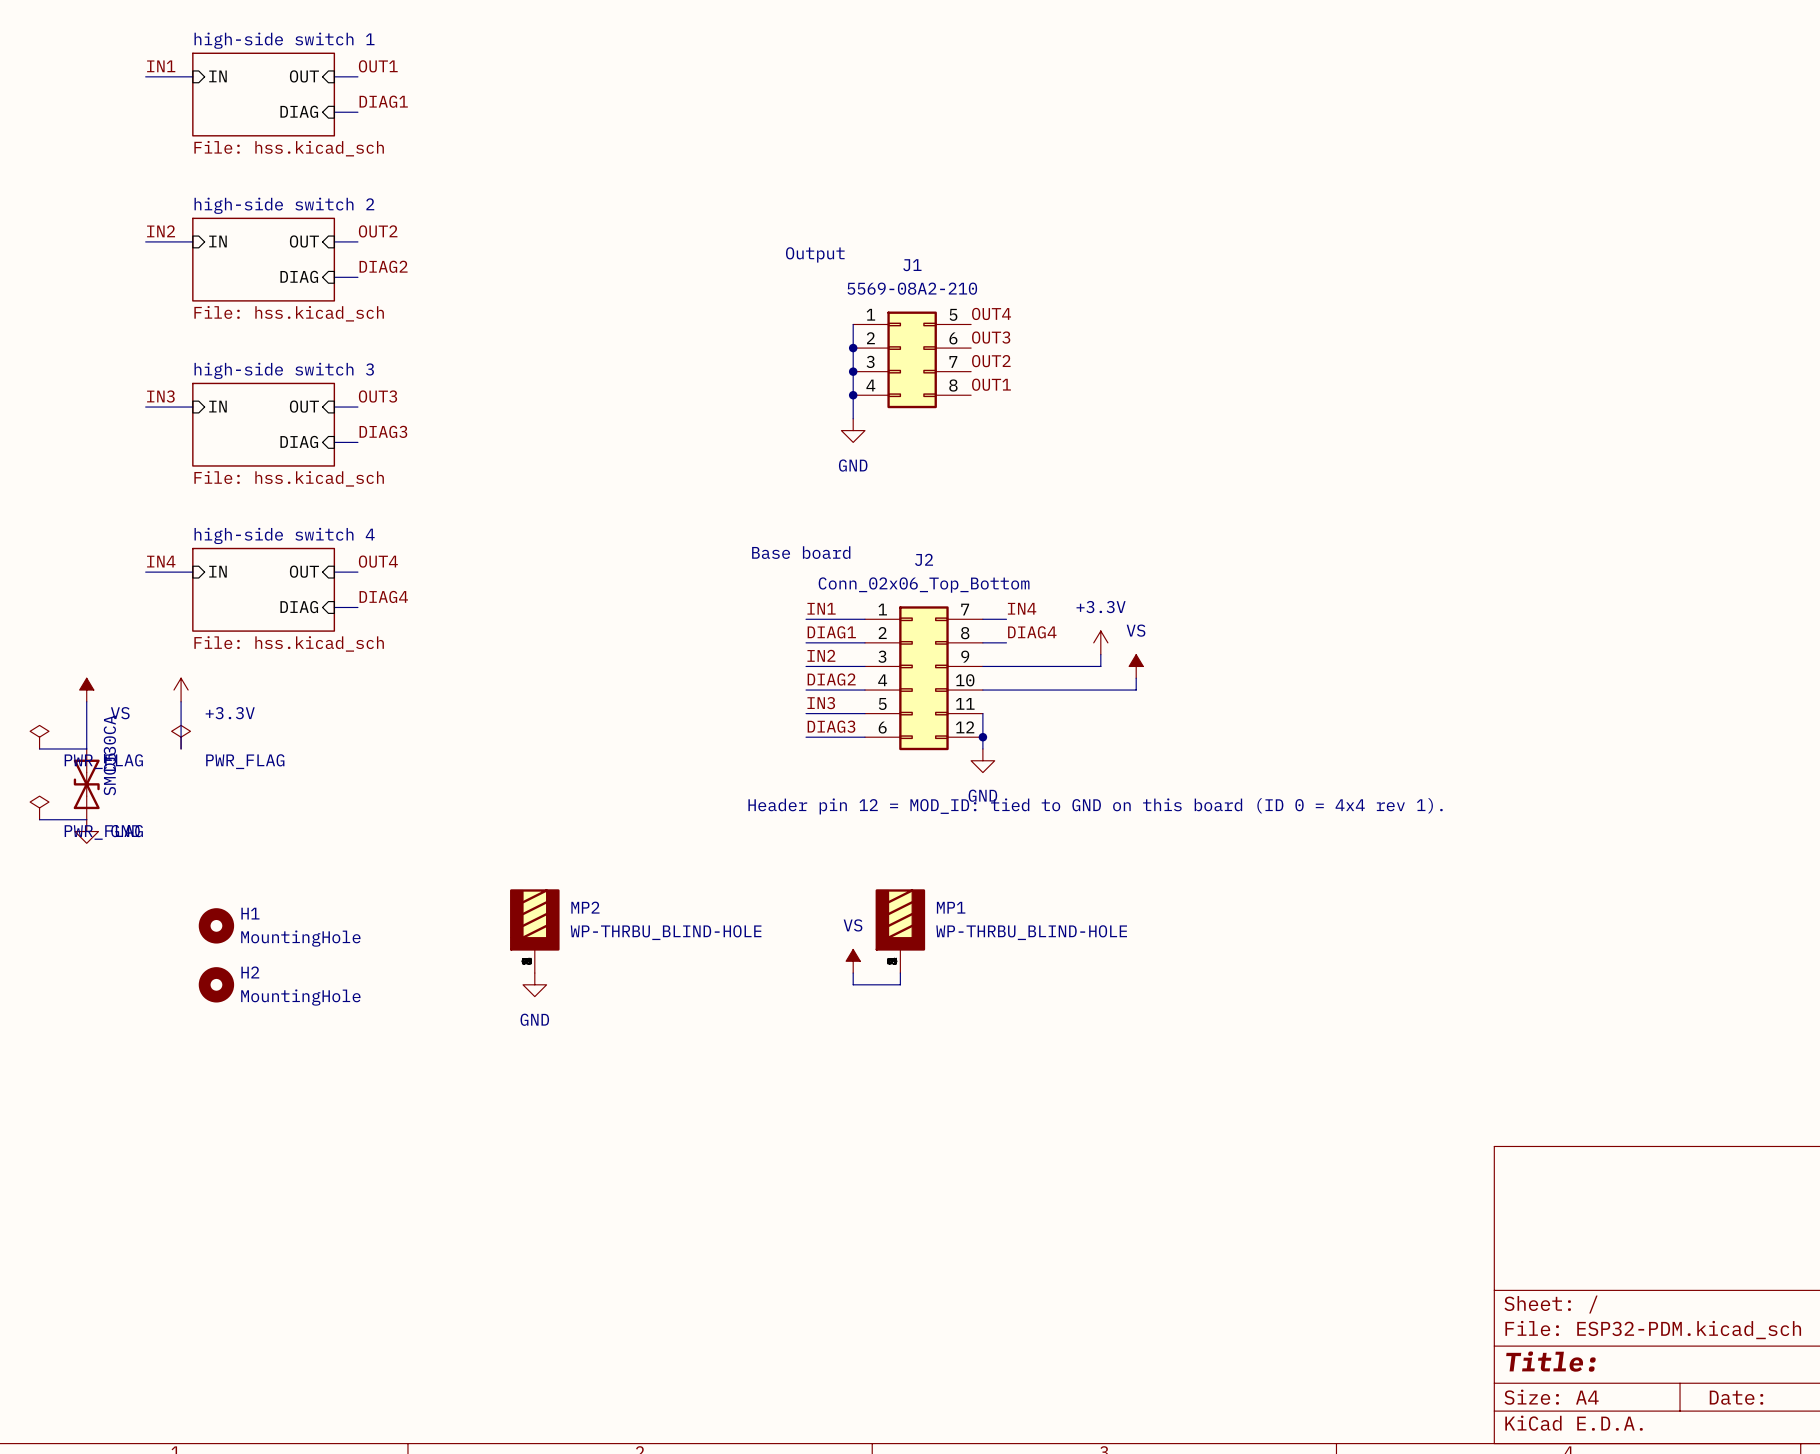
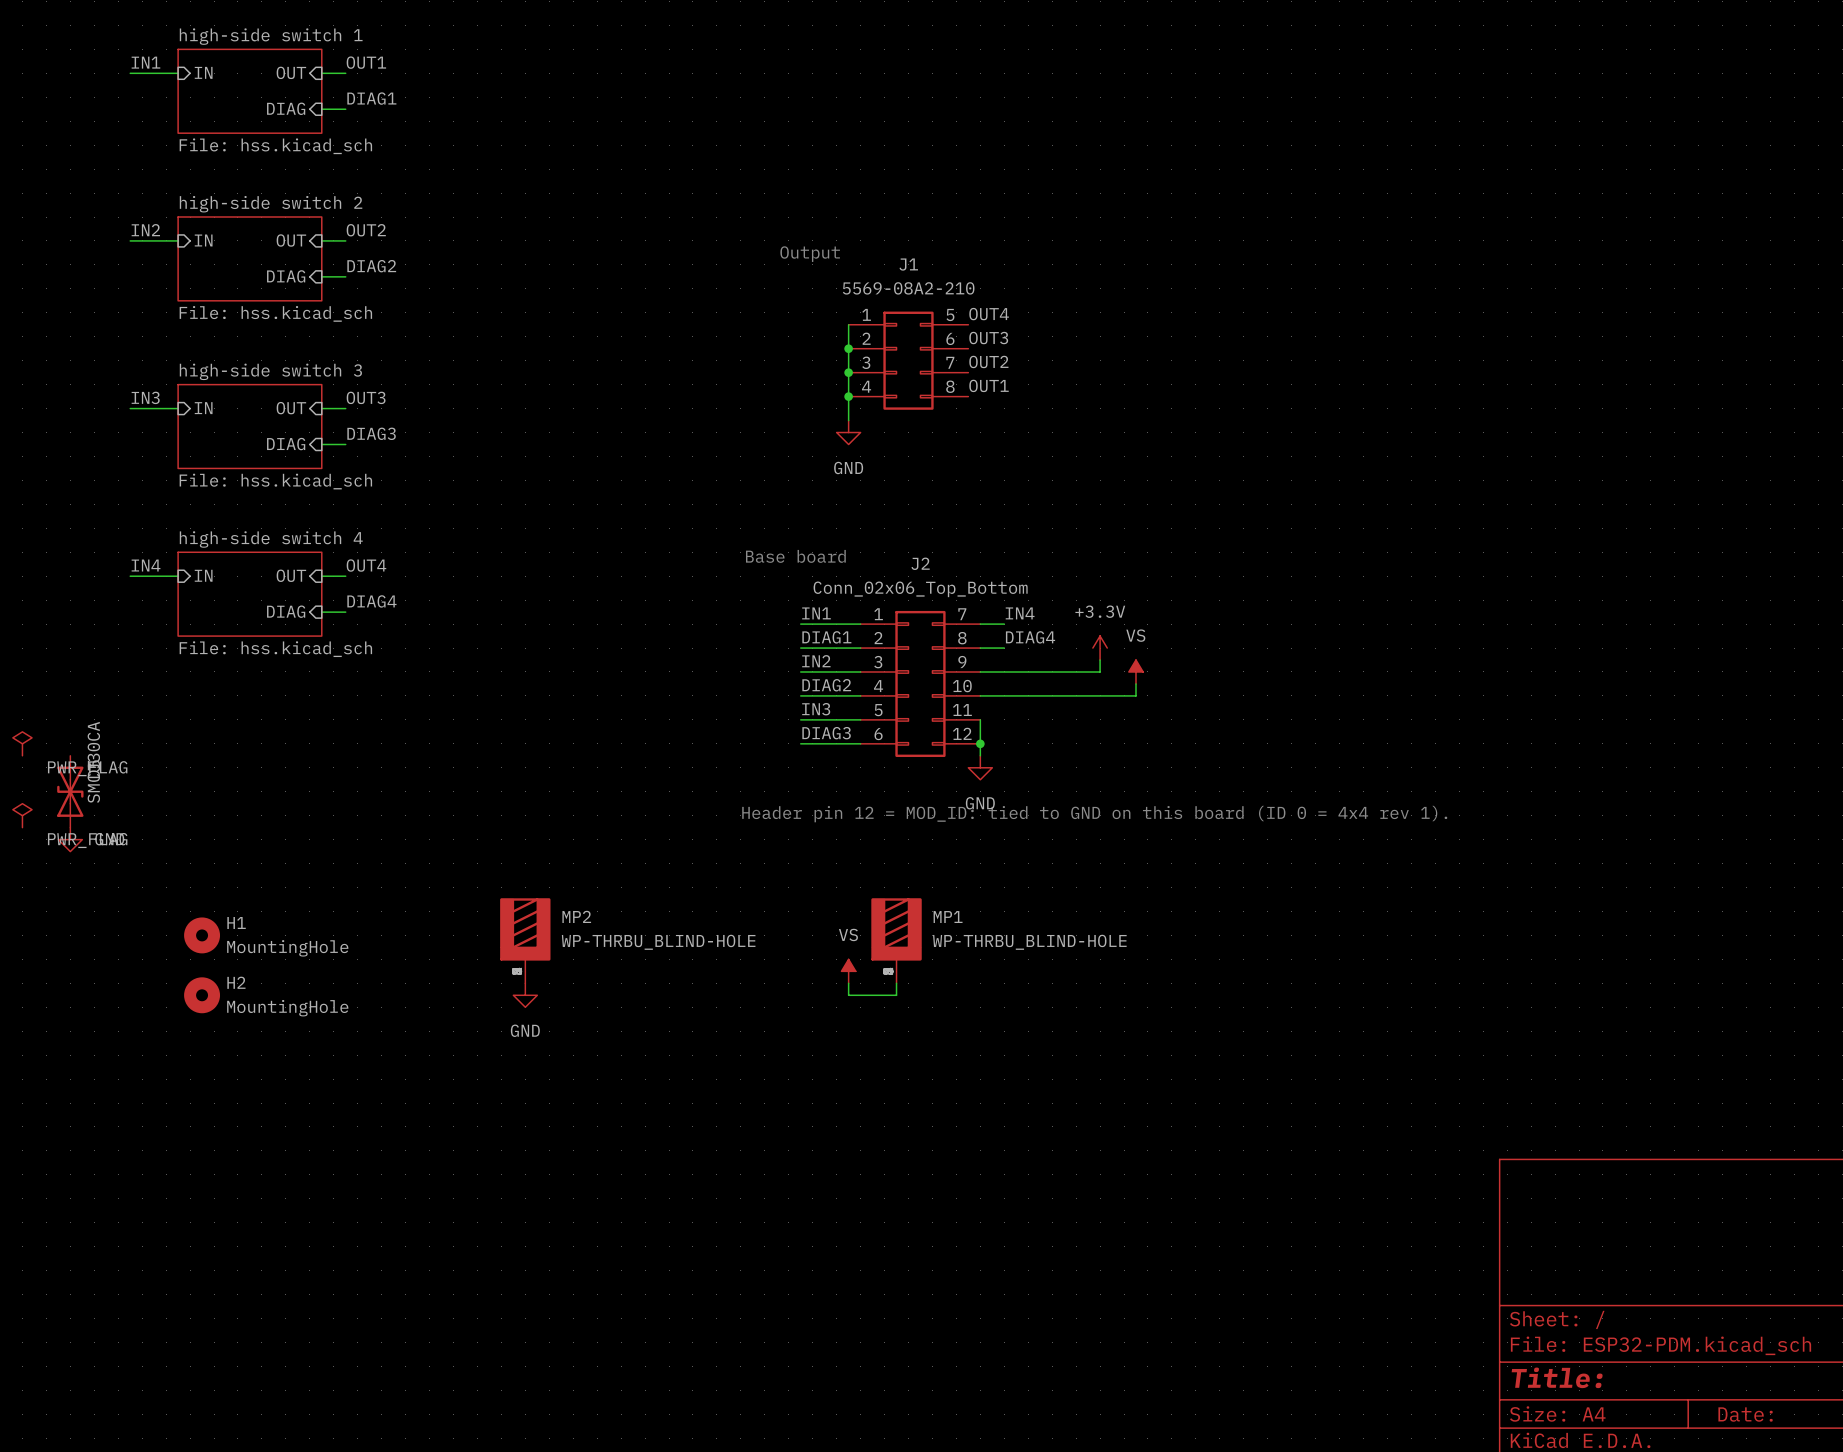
power symbol: VS (86, 690) -> none
power symbol: +3.3V (181, 690) -> none
wire: (86, 701) (86, 748) (39, 748) -> none
wire: (181, 701) (181, 748) -> none
power symbol: PWR_FLAG (181, 737) -> none
wire: (39, 819) (86, 819) -> none

